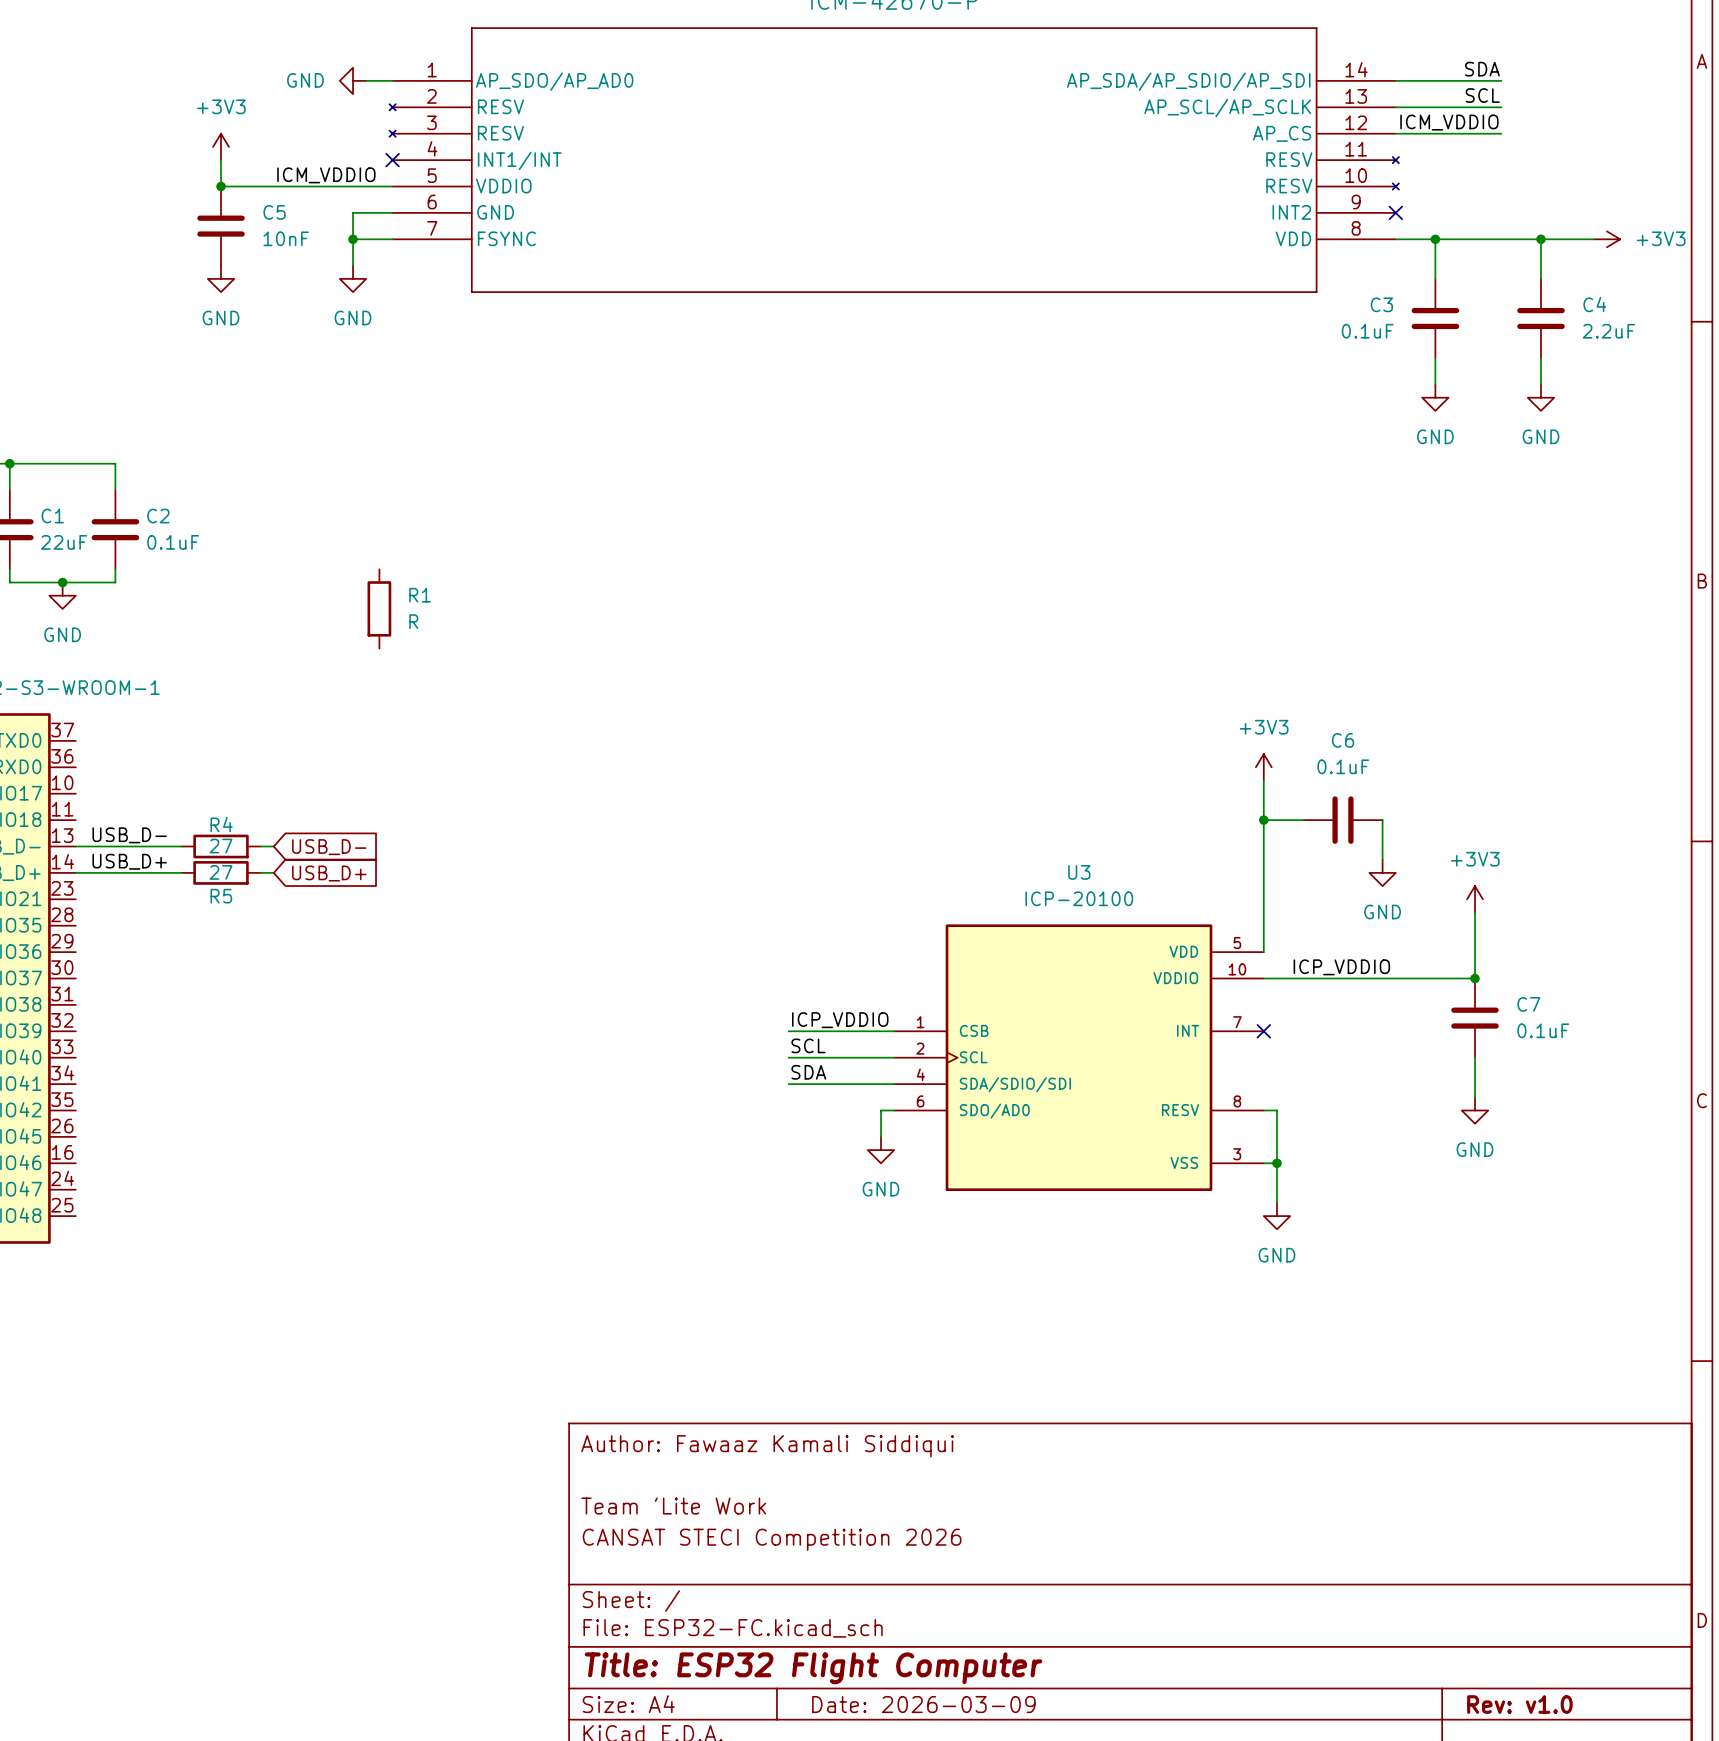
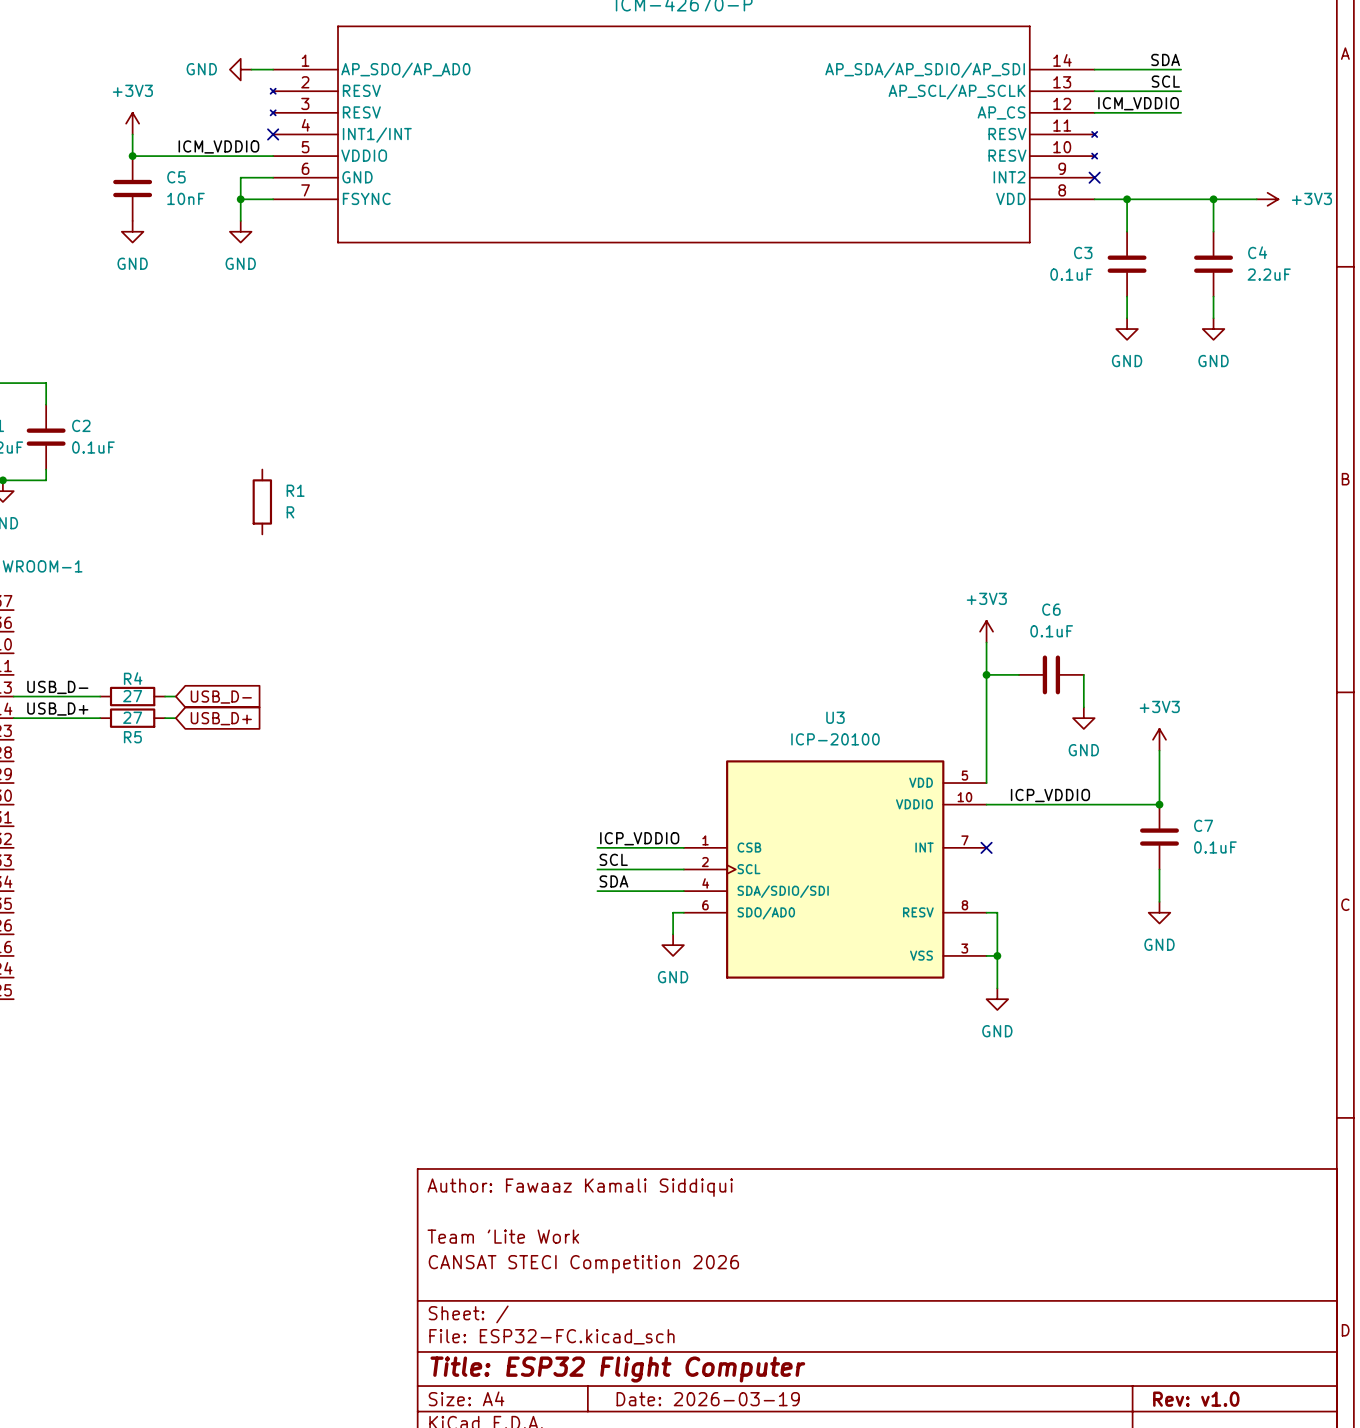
title block: Date: 2026-03-09 (923, 1704) -> Date: 2026-03-19 (708, 1399)

